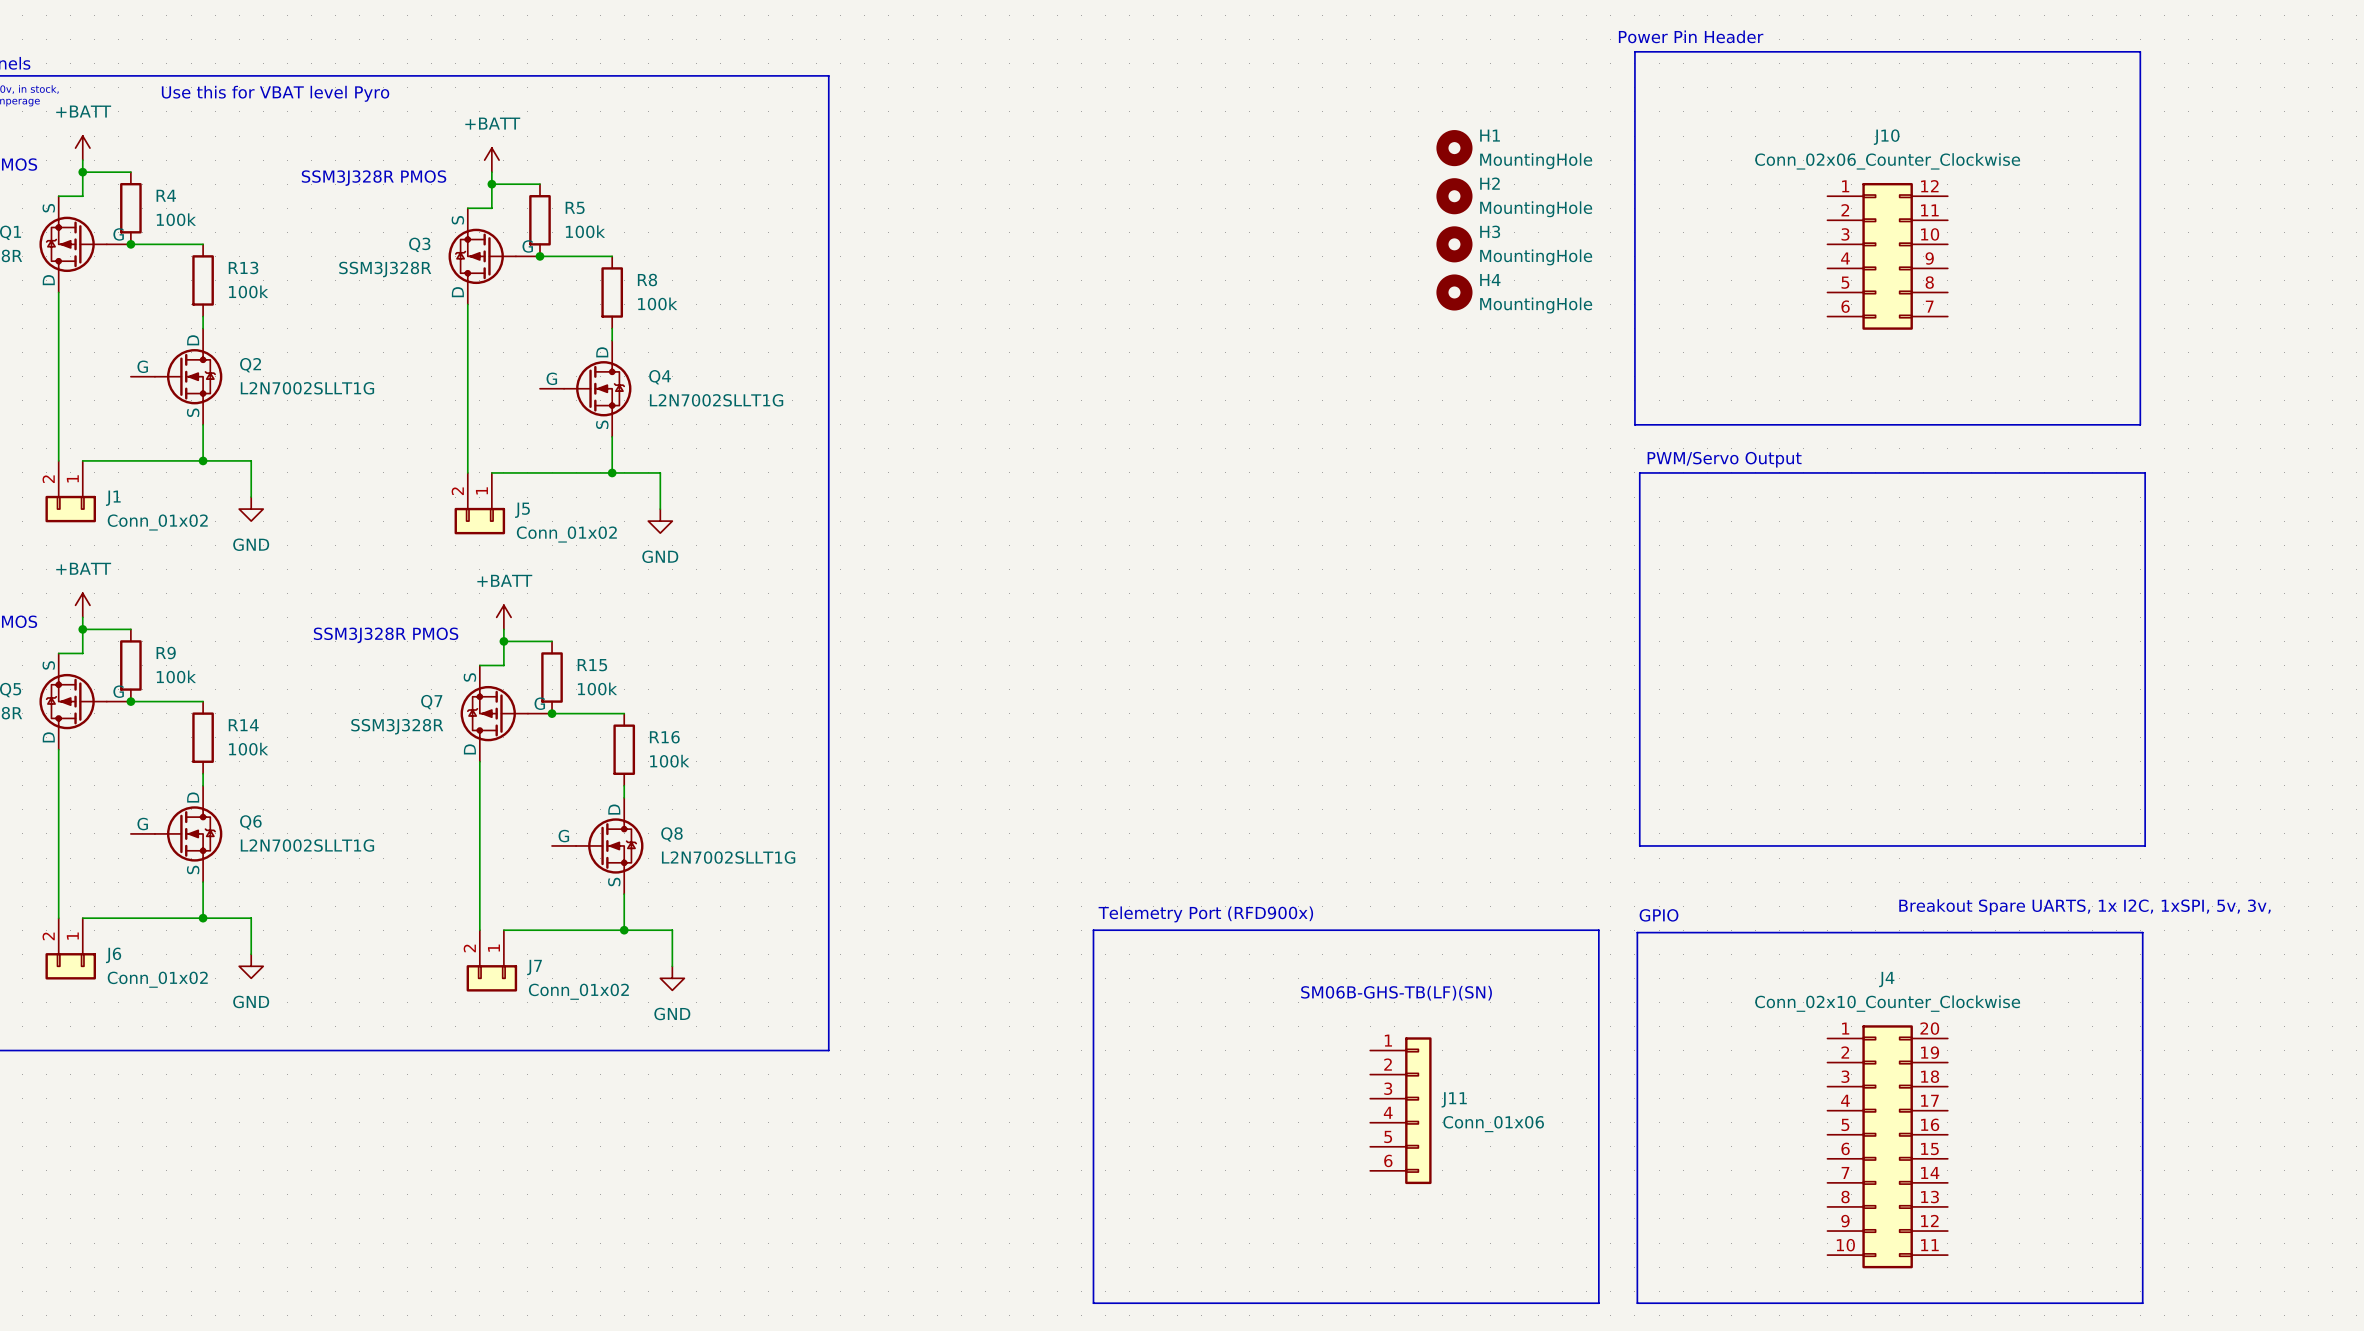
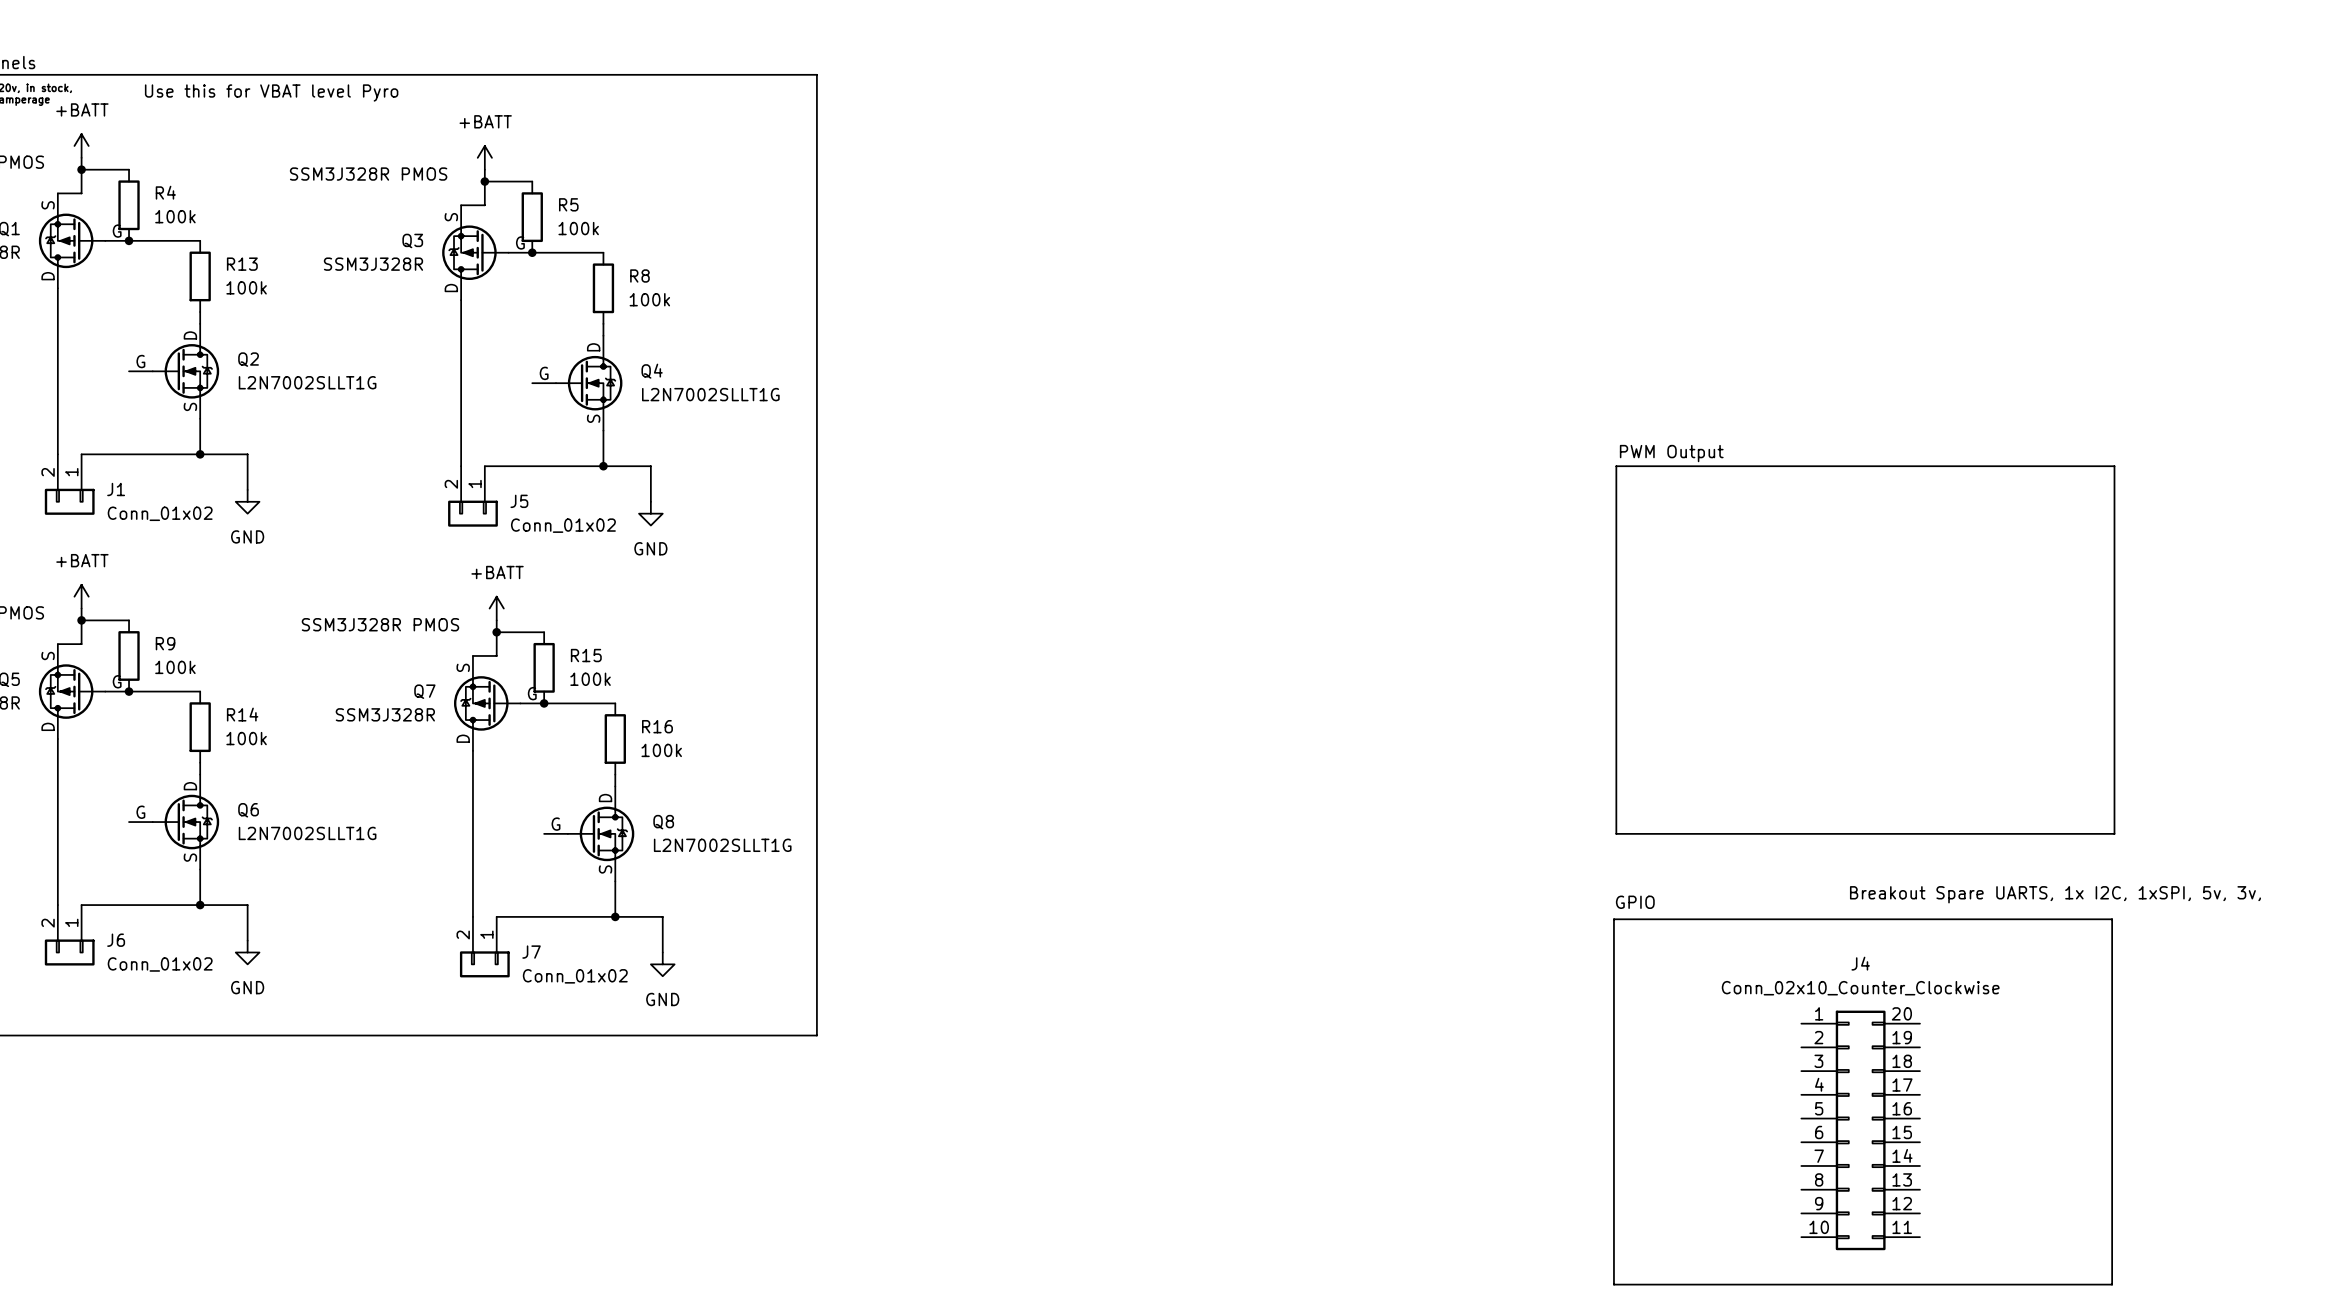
text: Power Pin Header (1691, 36) -> none
line: (1634, 51) (2140, 51) (2140, 424) (1634, 424) (1634, 51) -> none
H1: MountingHole (1454, 148) -> none
H2: MountingHole (1454, 196) -> none
H3: MountingHole (1454, 244) -> none
J10: Conn_02x06_Counter_Clockwise (1887, 256) -> none
H4: MountingHole (1454, 292) -> none
text: PWM/Servo Output (1724, 459) -> PWM Output (1671, 453)
text: Telemetry Port (RFD900x) (1205, 914) -> none
line: (1093, 930) (1598, 930) (1598, 1303) (1093, 1303) (1093, 930) -> none
text: SM06B-GHS-TB(LF)(SN) (1396, 993) -> none
J11: Conn_01x06 (1400, 1110) -> none

